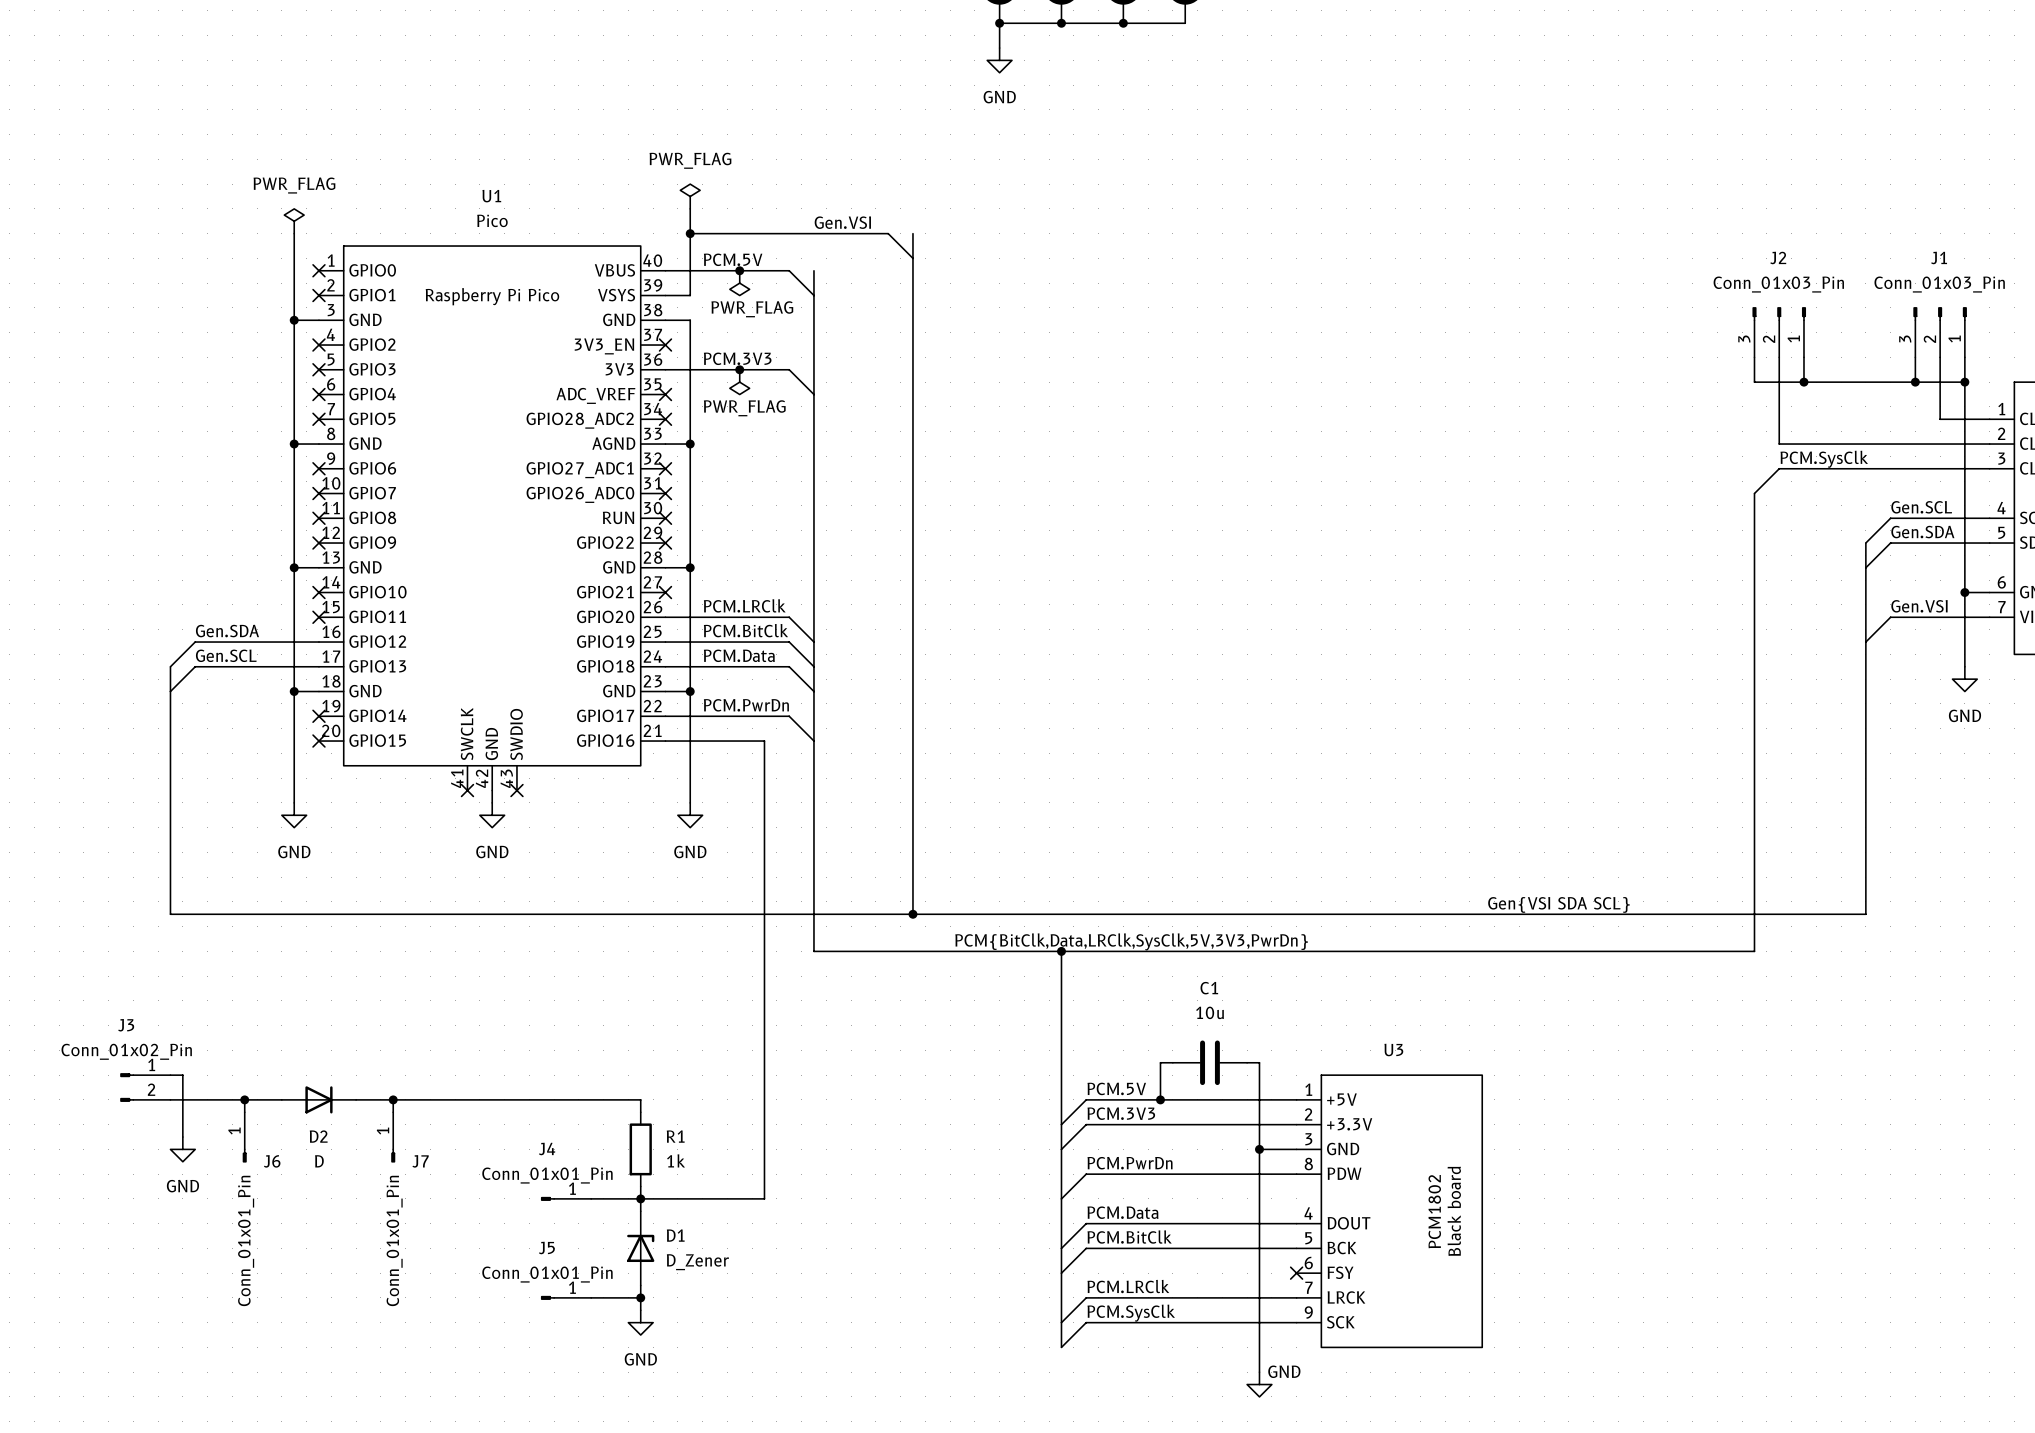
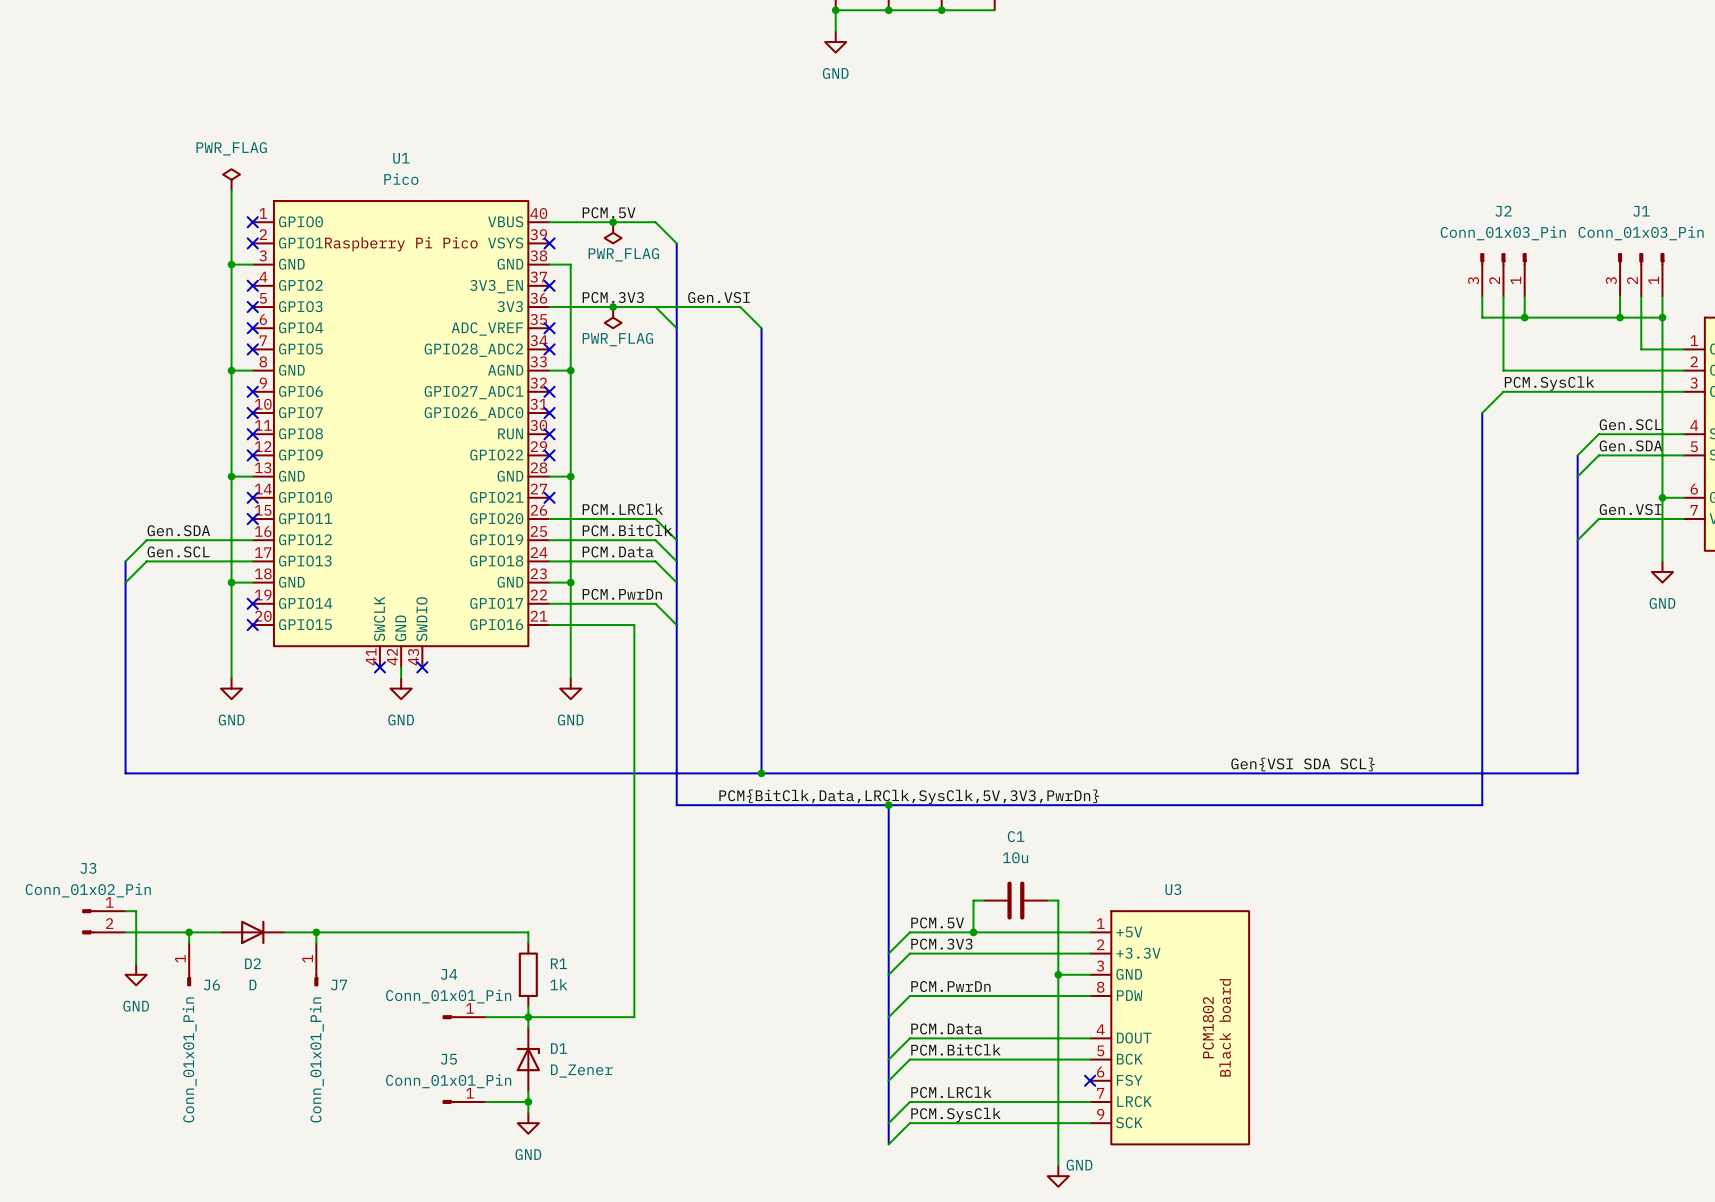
power symbol: PWR_FLAG (690, 196) -> none
wire: (690, 208) (690, 295) (665, 295) -> none
label position: Gen.VSI (842, 222) -> Gen.VSI (719, 297)
wire: (690, 233) (888, 233) (912, 258) -> none
junction: (690, 233) -> none
bus: (912, 233) (912, 394) -> none
bus: (813, 270) (813, 295) -> none
no-connect mark: none -> (549, 243)
wire: none -> (655, 307) (740, 307) (761, 328)

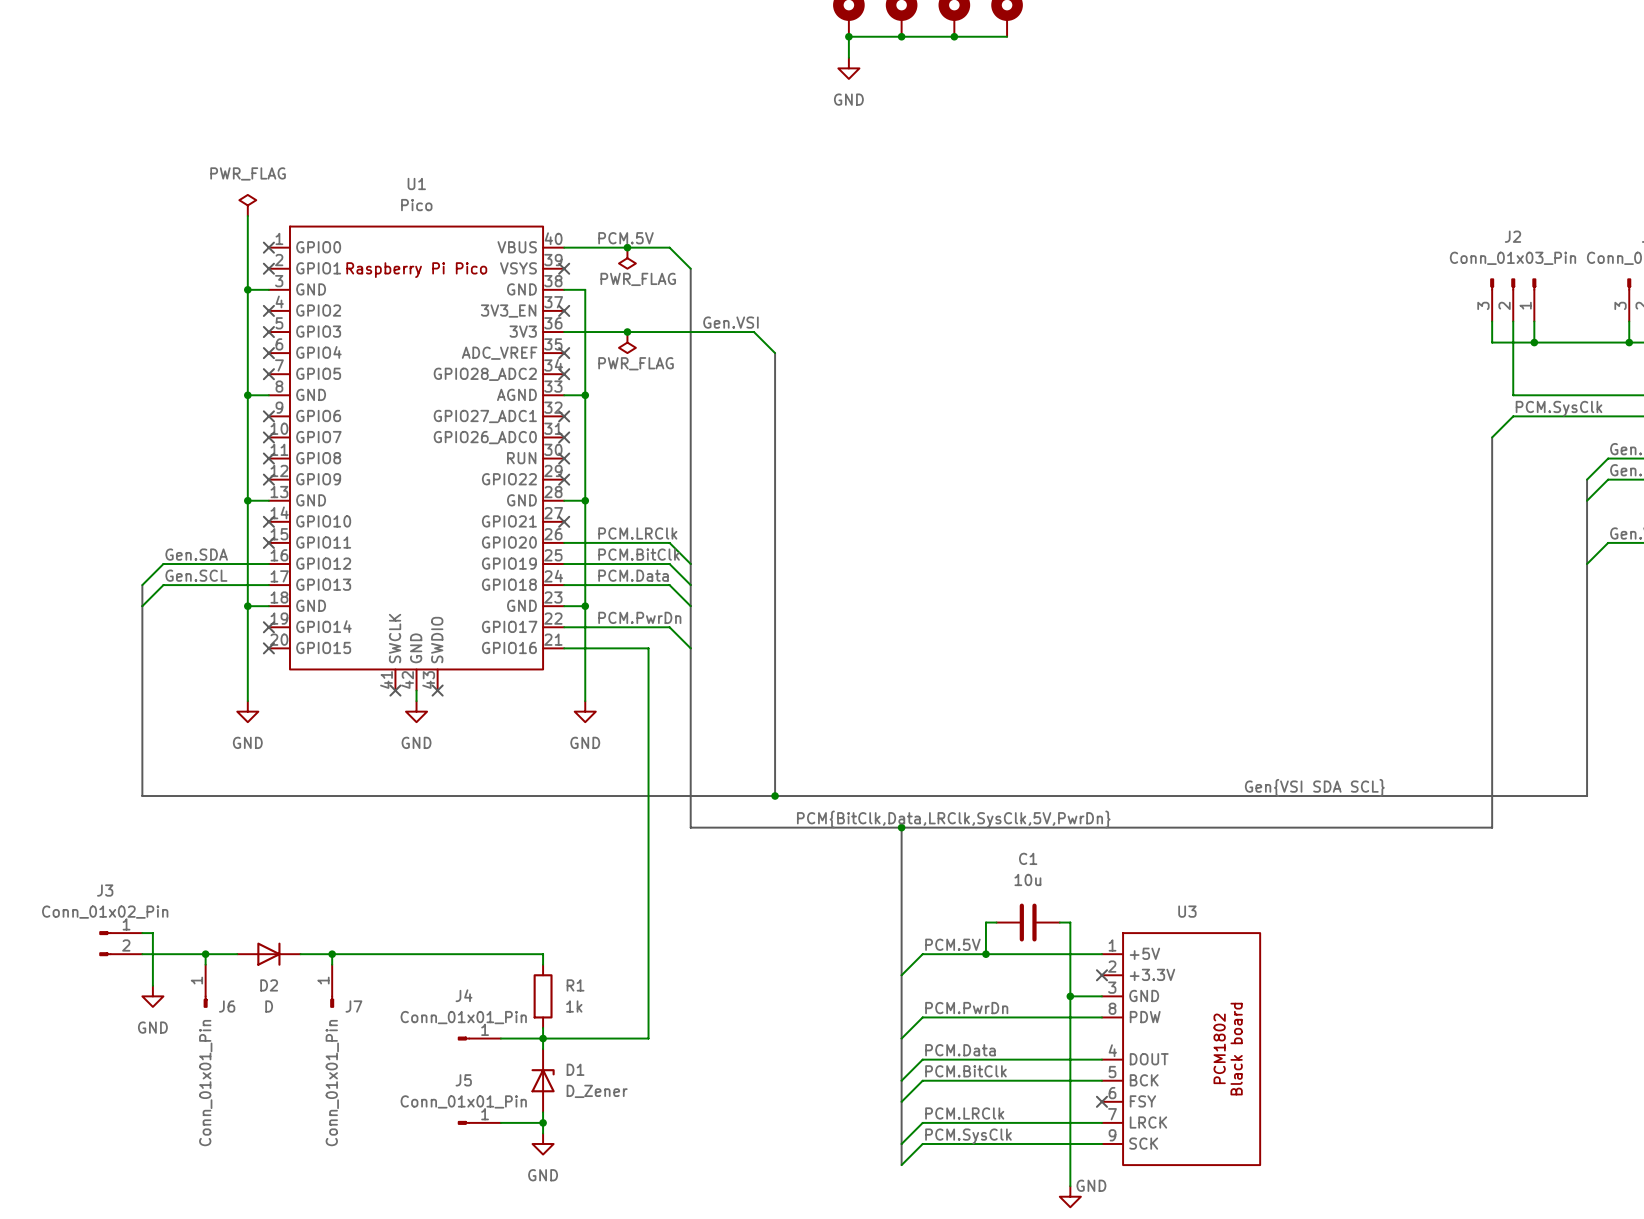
label: PCM.3V3 (613, 297) -> none
wire: (655, 307) (676, 328) -> none
label: PCM{BitClk,Data,LRClk,SysClk,5V,3V3,PwrDn} (909, 796) -> PCM{BitClk,Data,LRClk,SysClk,5V,PwrDn} (953, 819)
label: PCM.3V3 (941, 944) -> none
wire: (1090, 953) (909, 953) (888, 974) -> none
no-connect mark: none -> (1101, 975)

